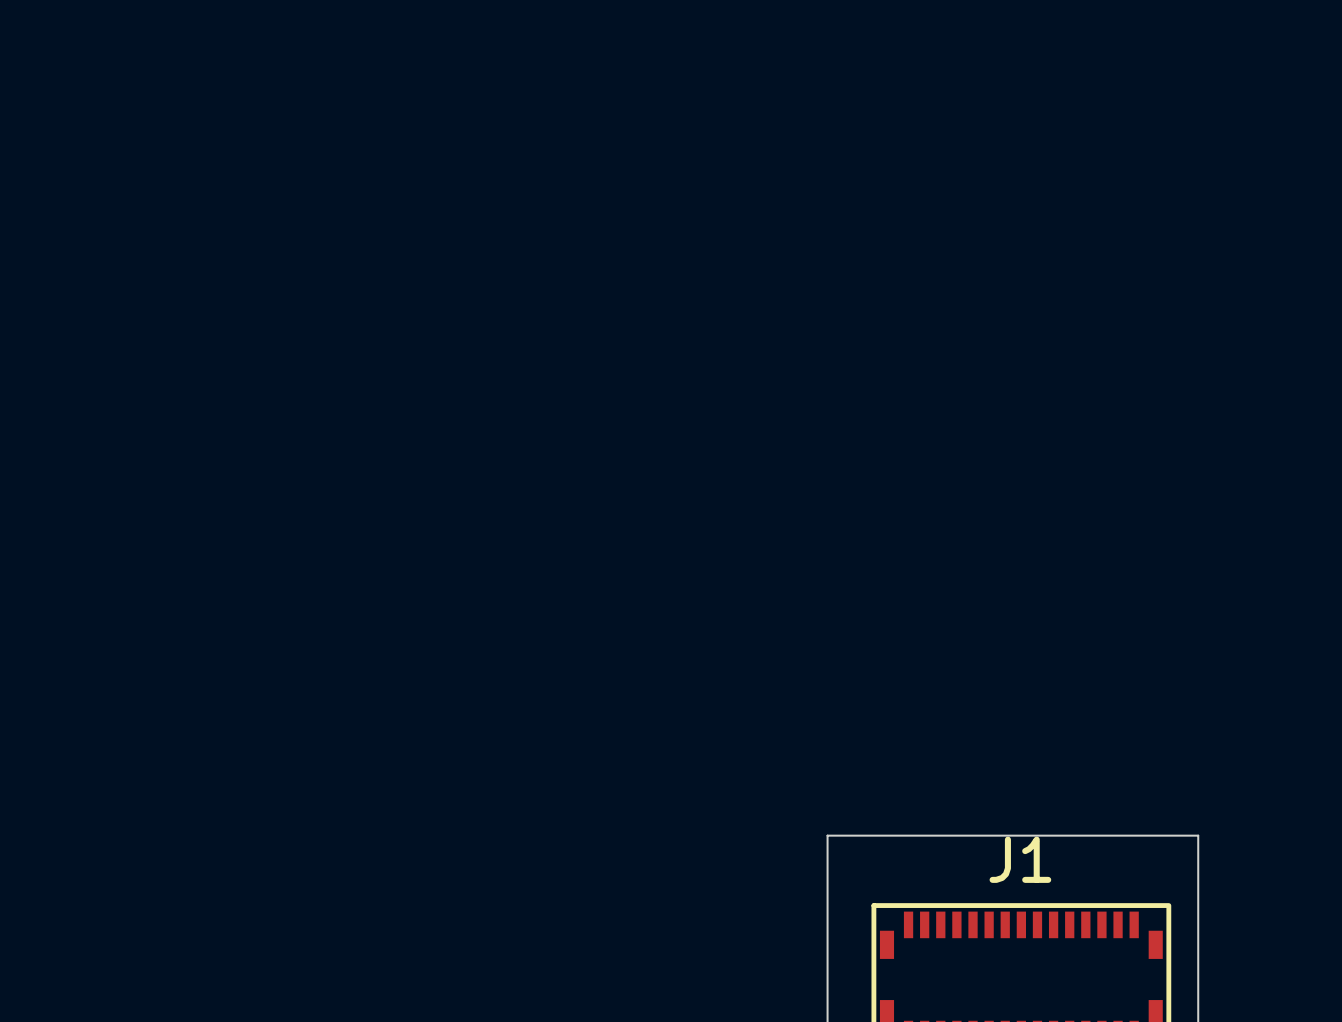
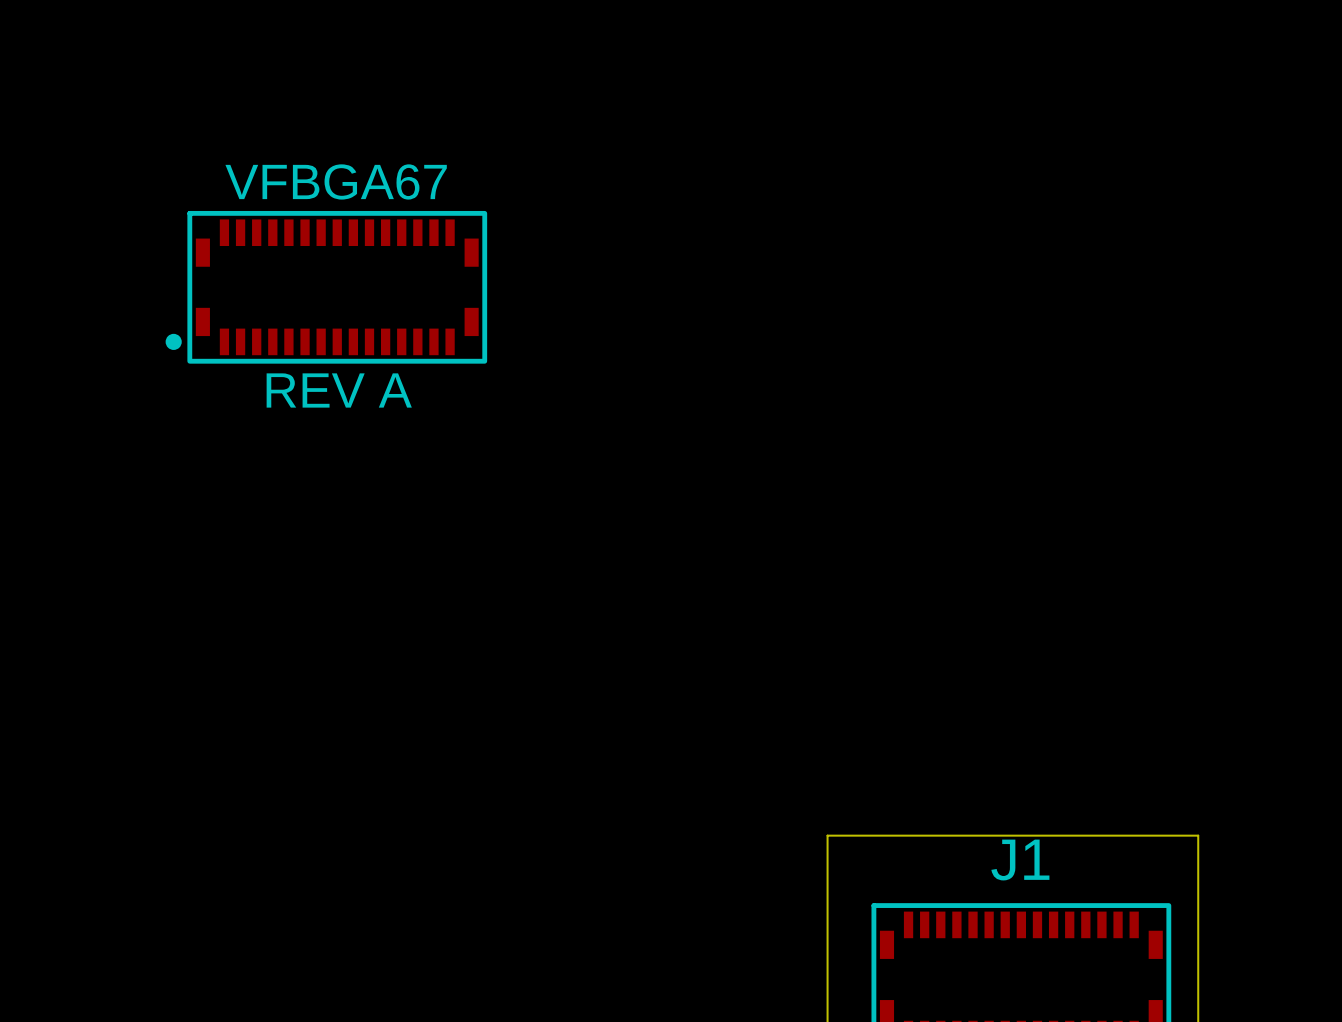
text: none -> VFBGA67 (336, 181)
part: none -> (326, 287)
text: none -> REV A (339, 390)

